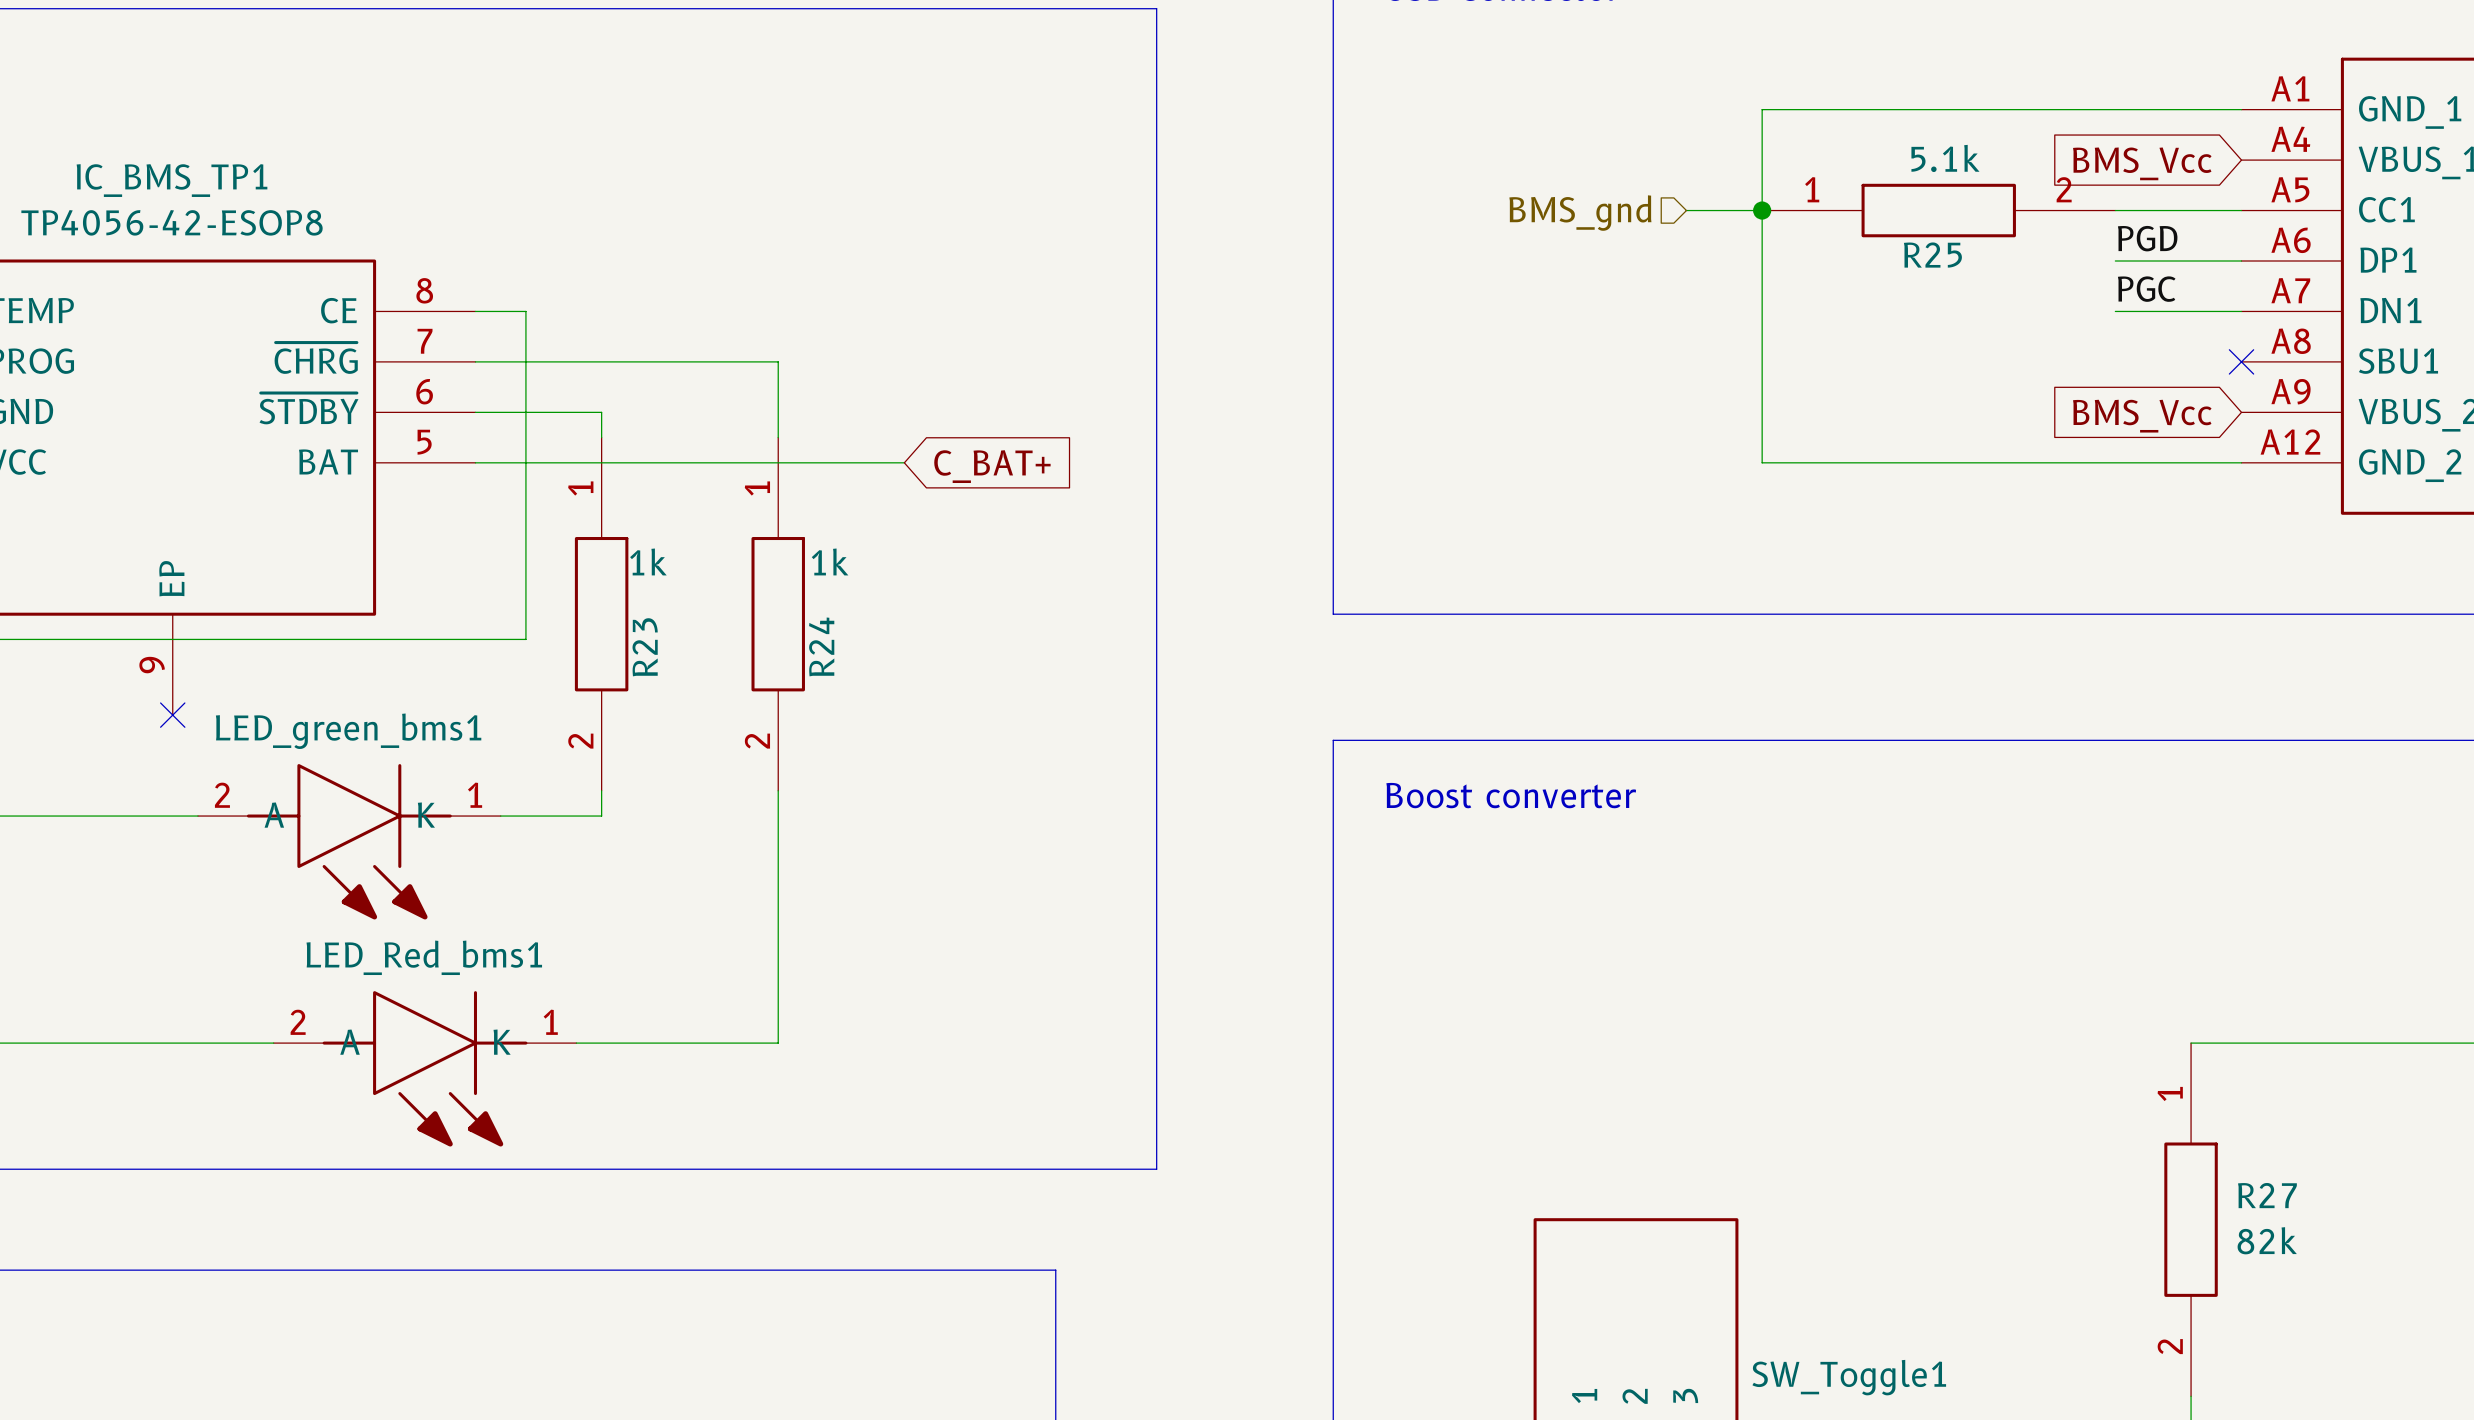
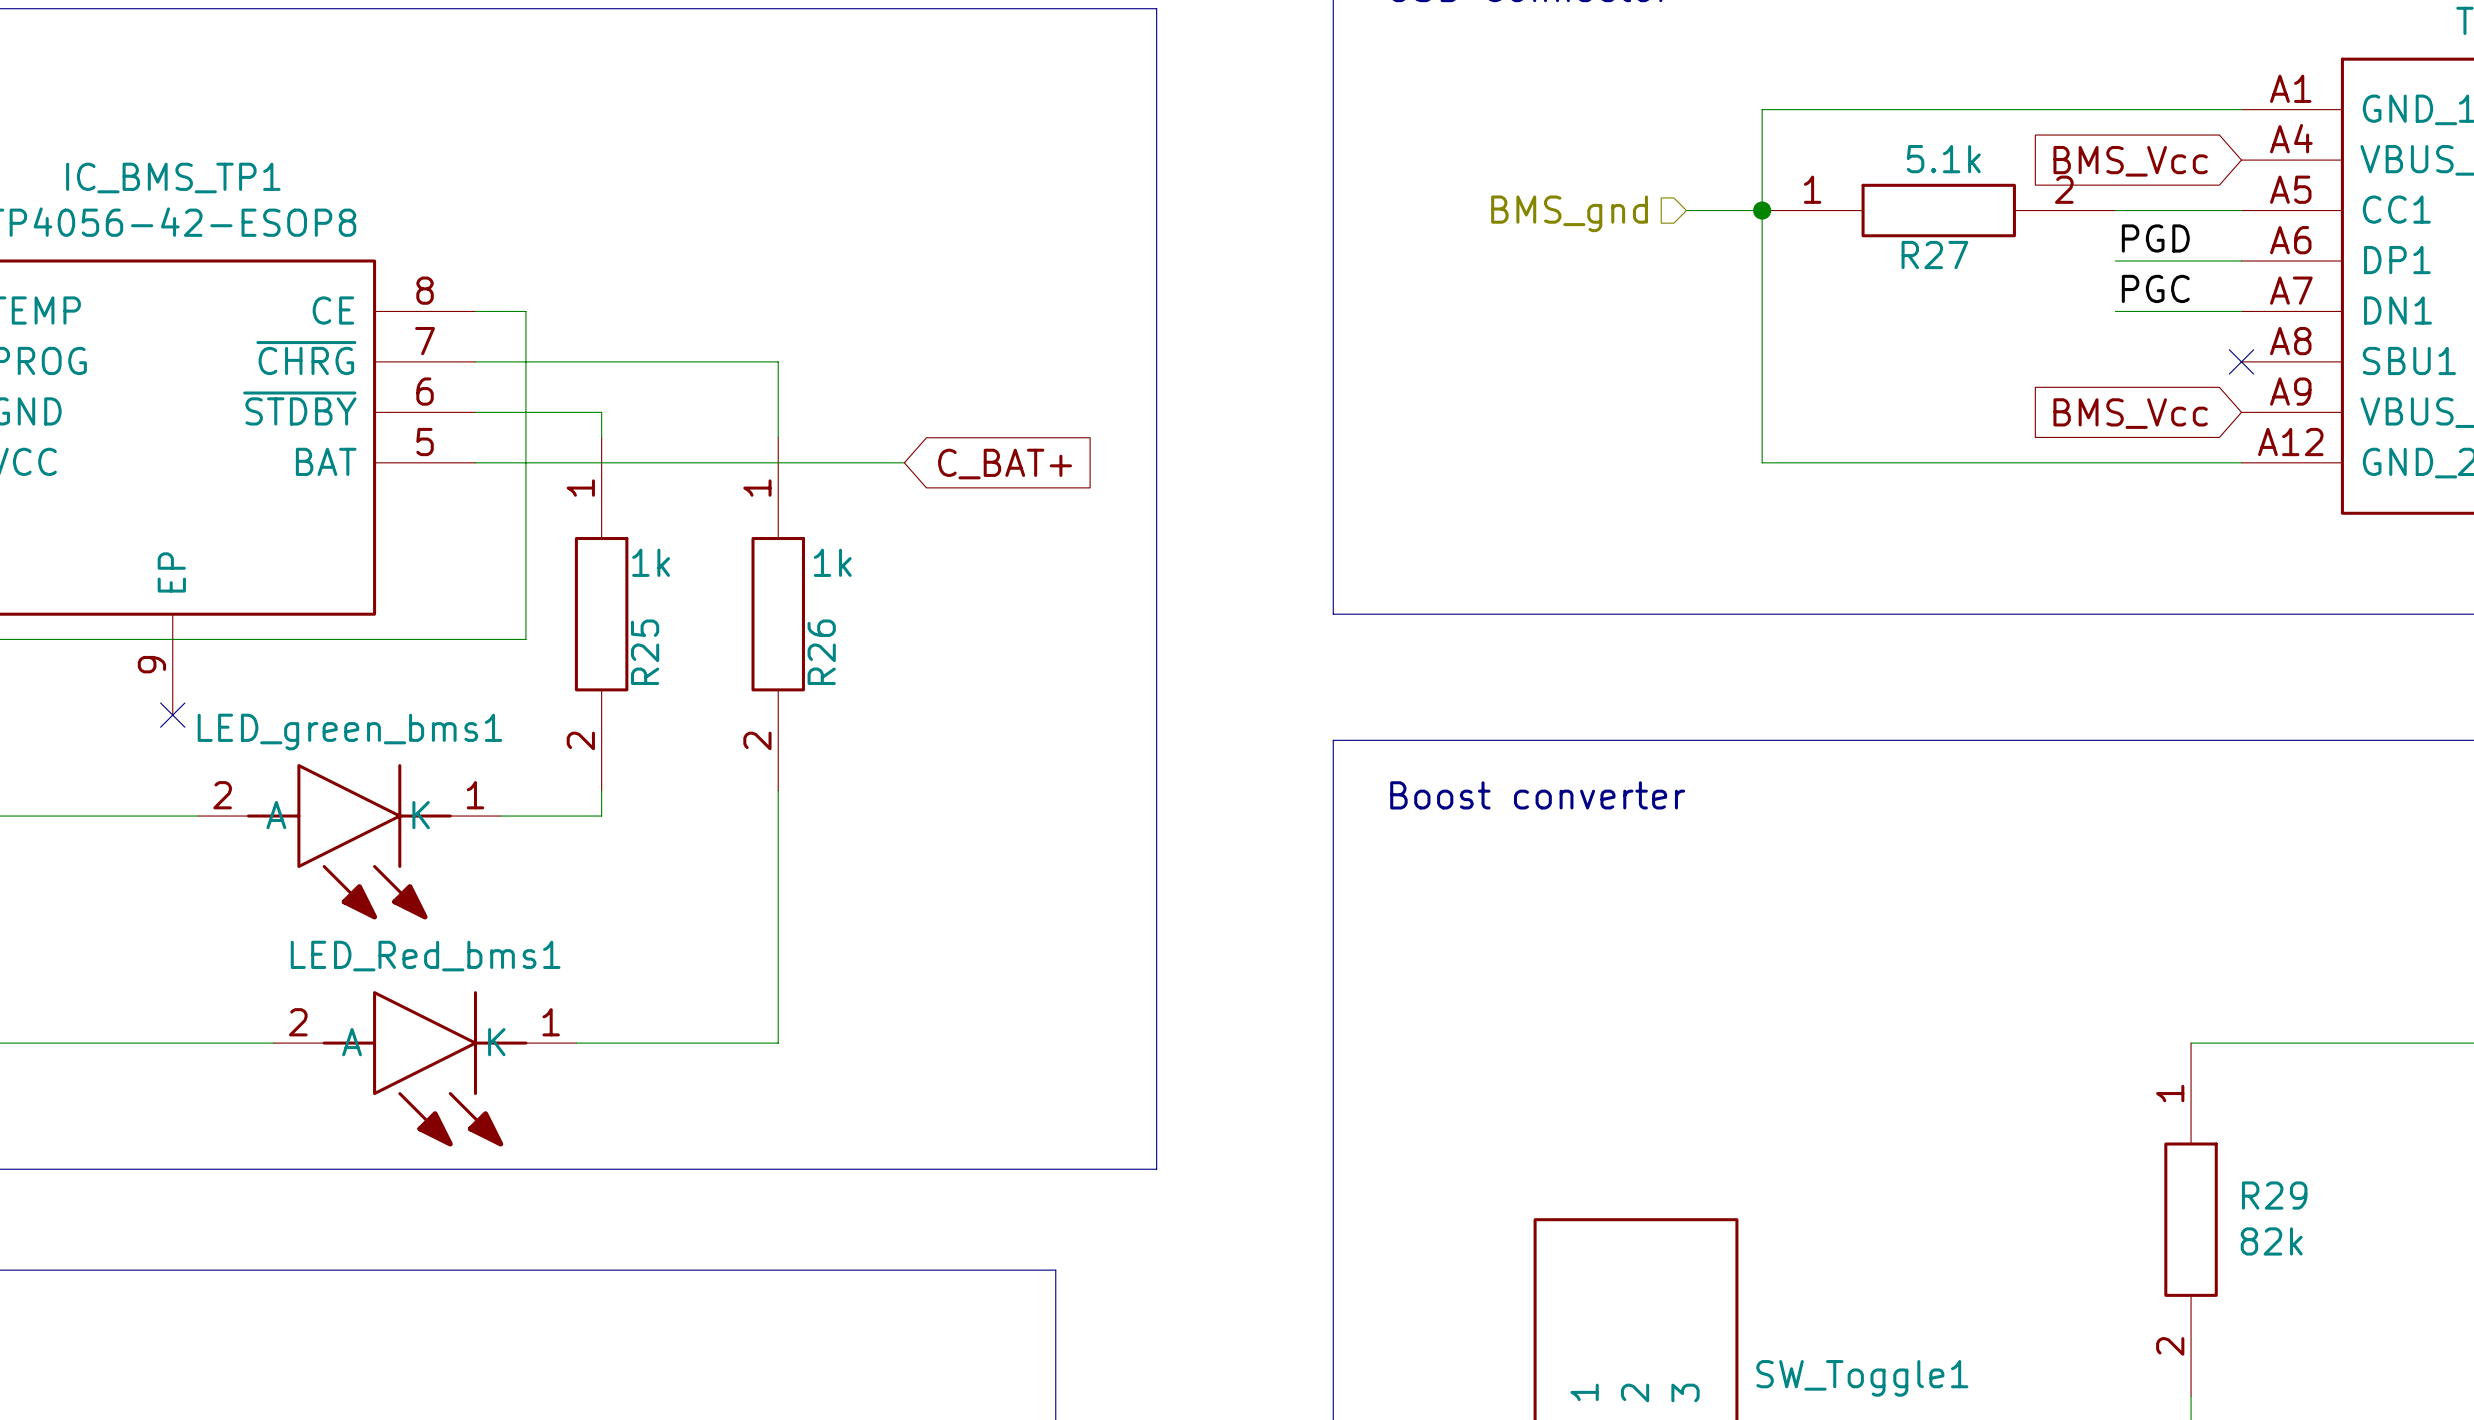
R25 name: R25 (1932, 255) -> R27 (1934, 255)
R24 name: R24 (821, 646) -> R26 (821, 652)
R23 name: R23 (645, 647) -> R25 (645, 652)
R27 name: R27 (2267, 1195) -> R29 (2274, 1195)

